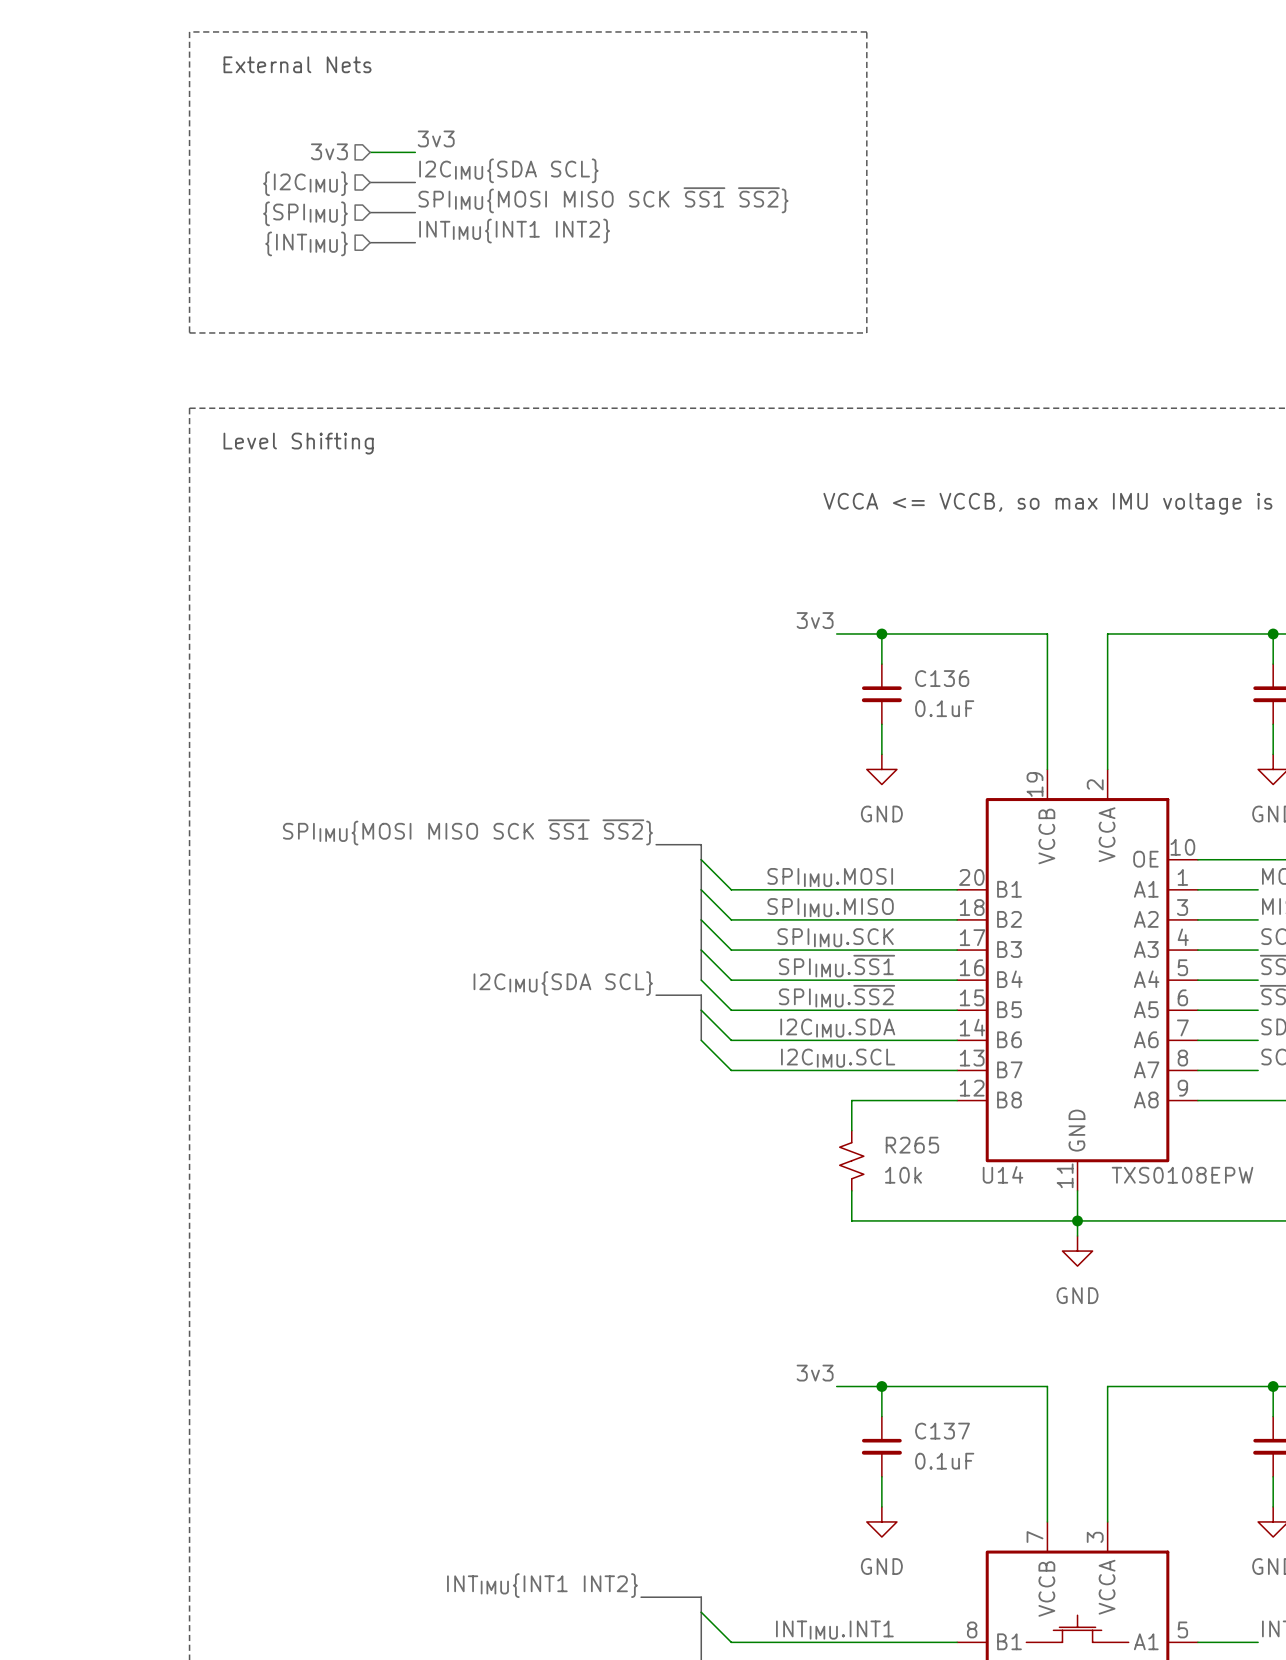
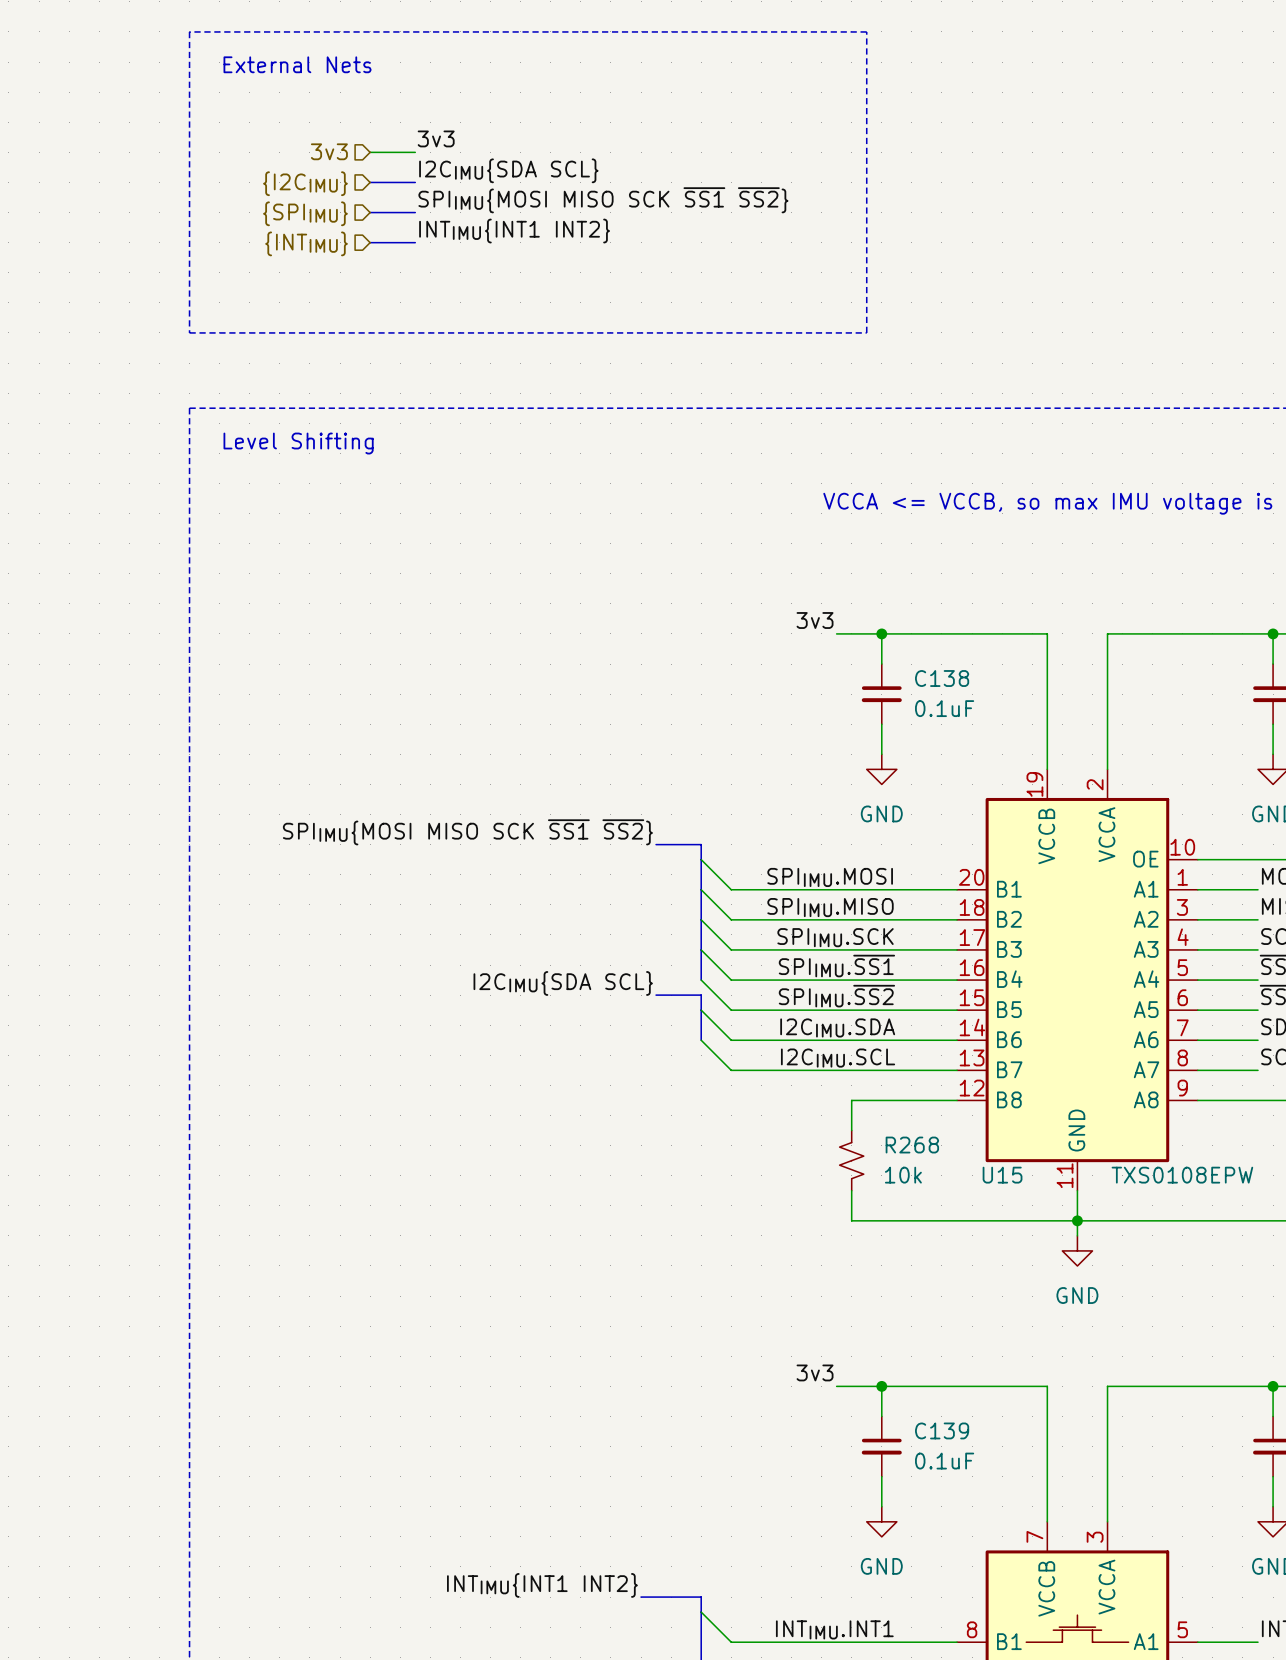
C136 name: C136 (942, 678) -> C138 (942, 678)
R265 name: R265 (912, 1145) -> R268 (912, 1145)
U14 name: U14 (1002, 1174) -> U15 (1002, 1175)
C137 name: C137 (942, 1431) -> C139 (942, 1430)

